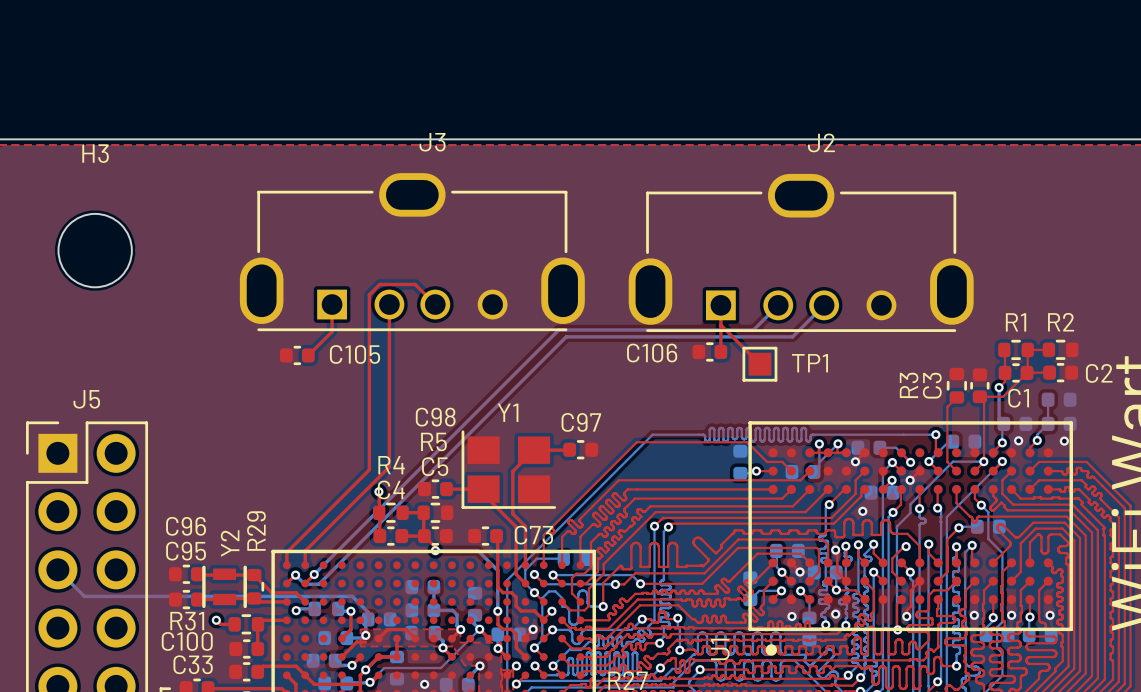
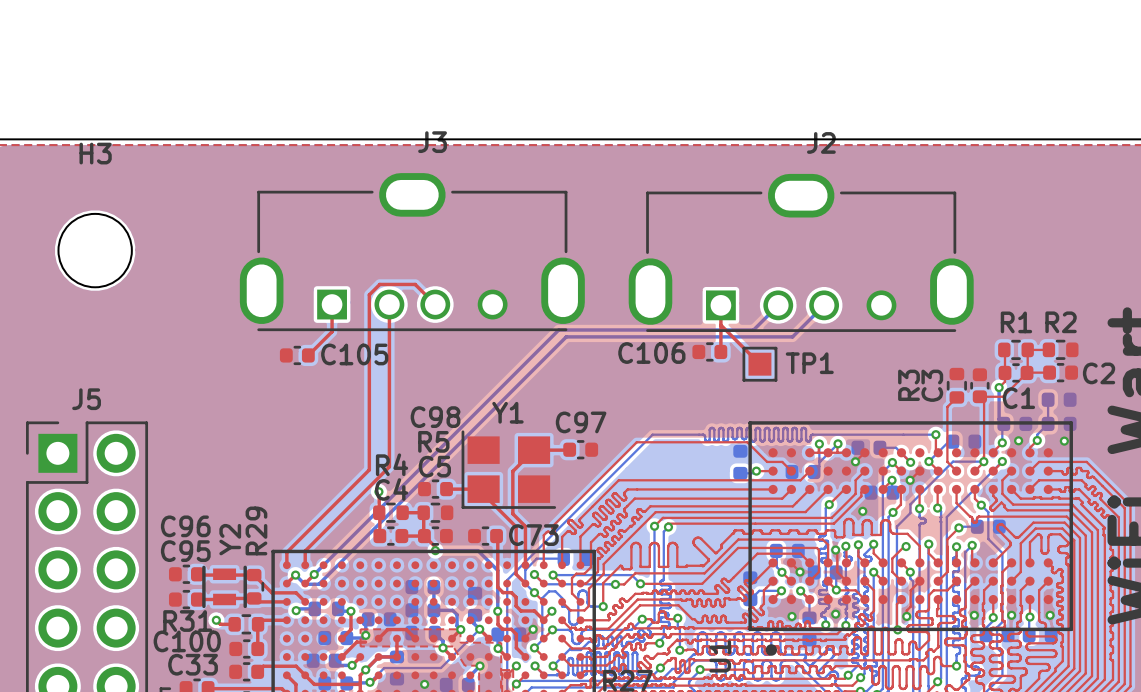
bottom track: (57, 569) (84, 596) (352, 596) (368, 612) (368, 619) -> none

